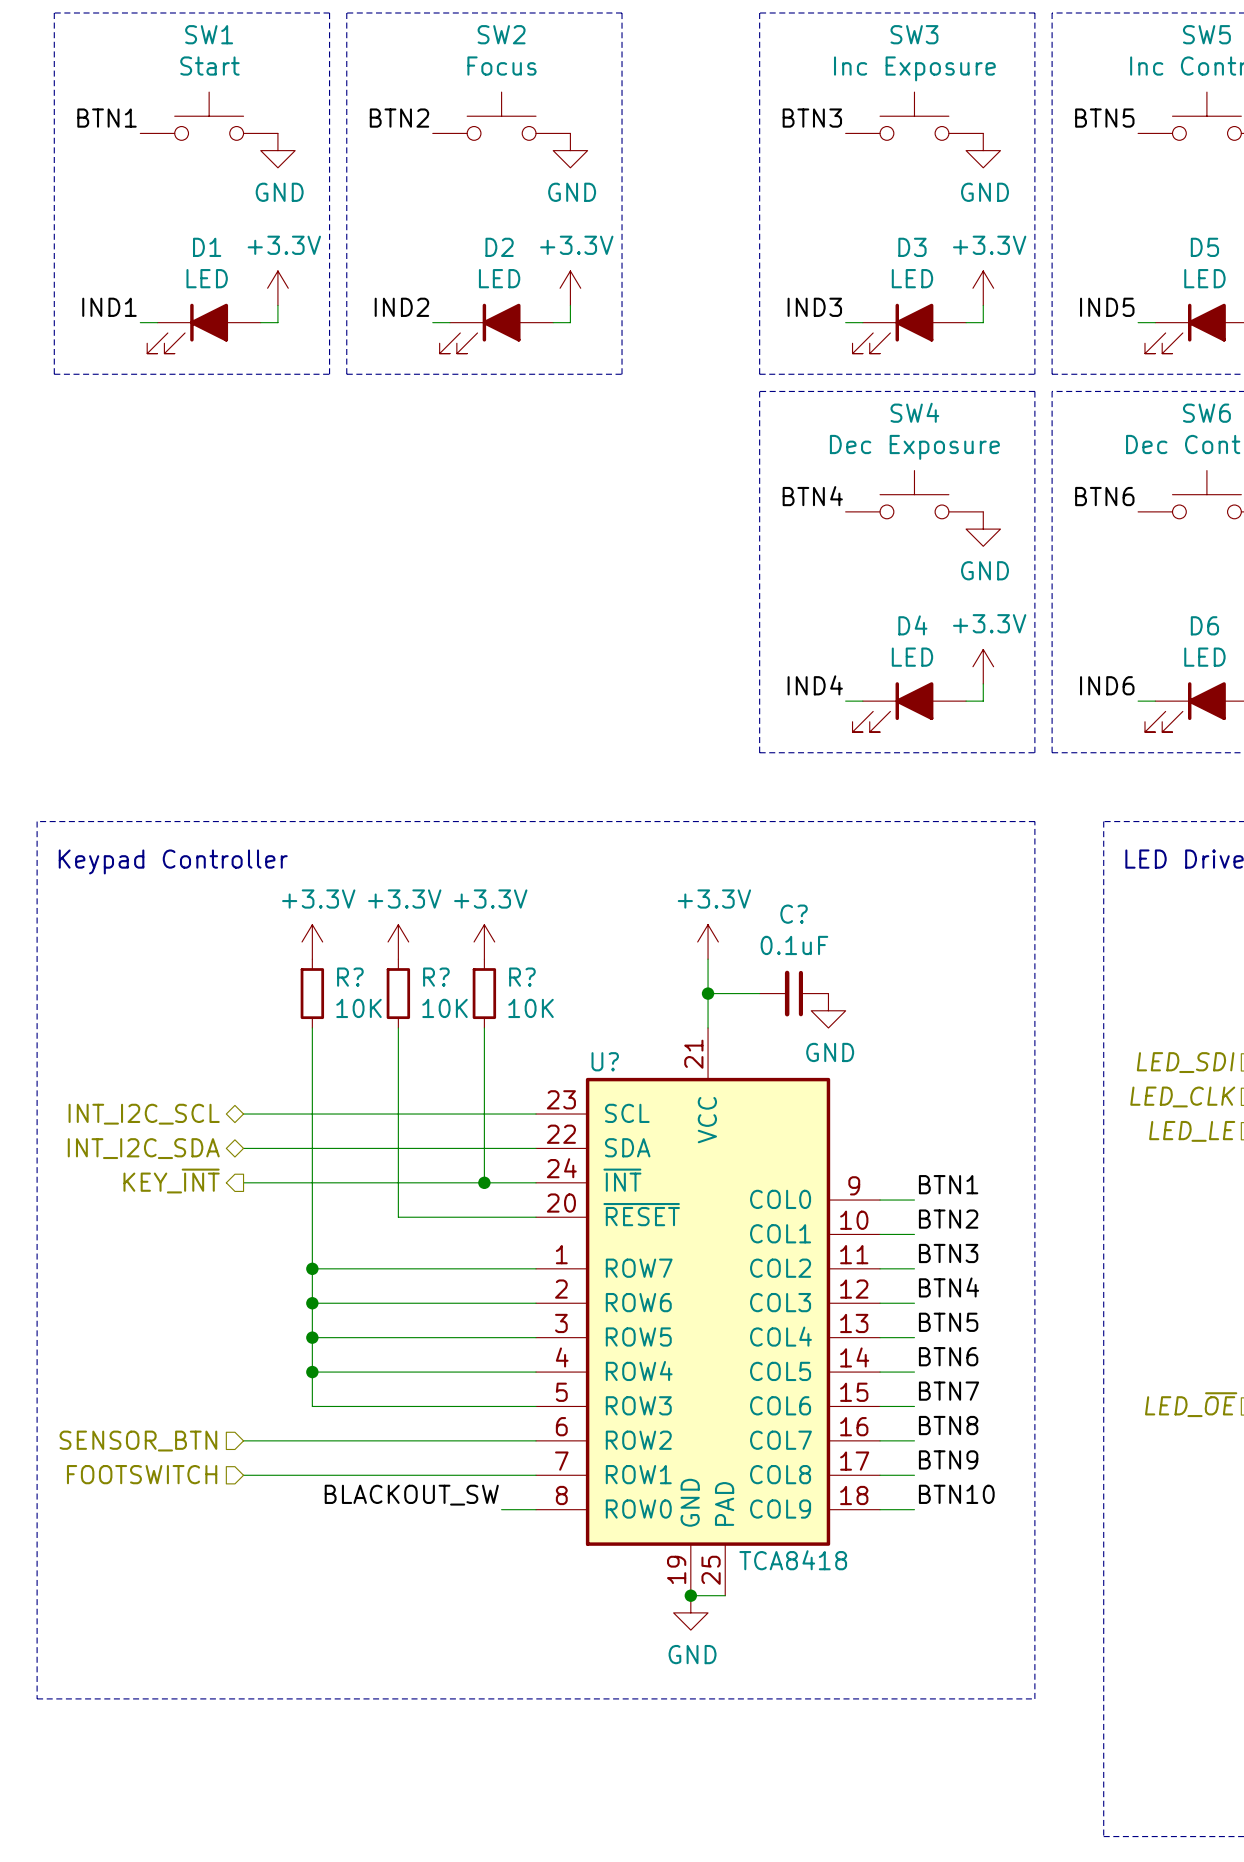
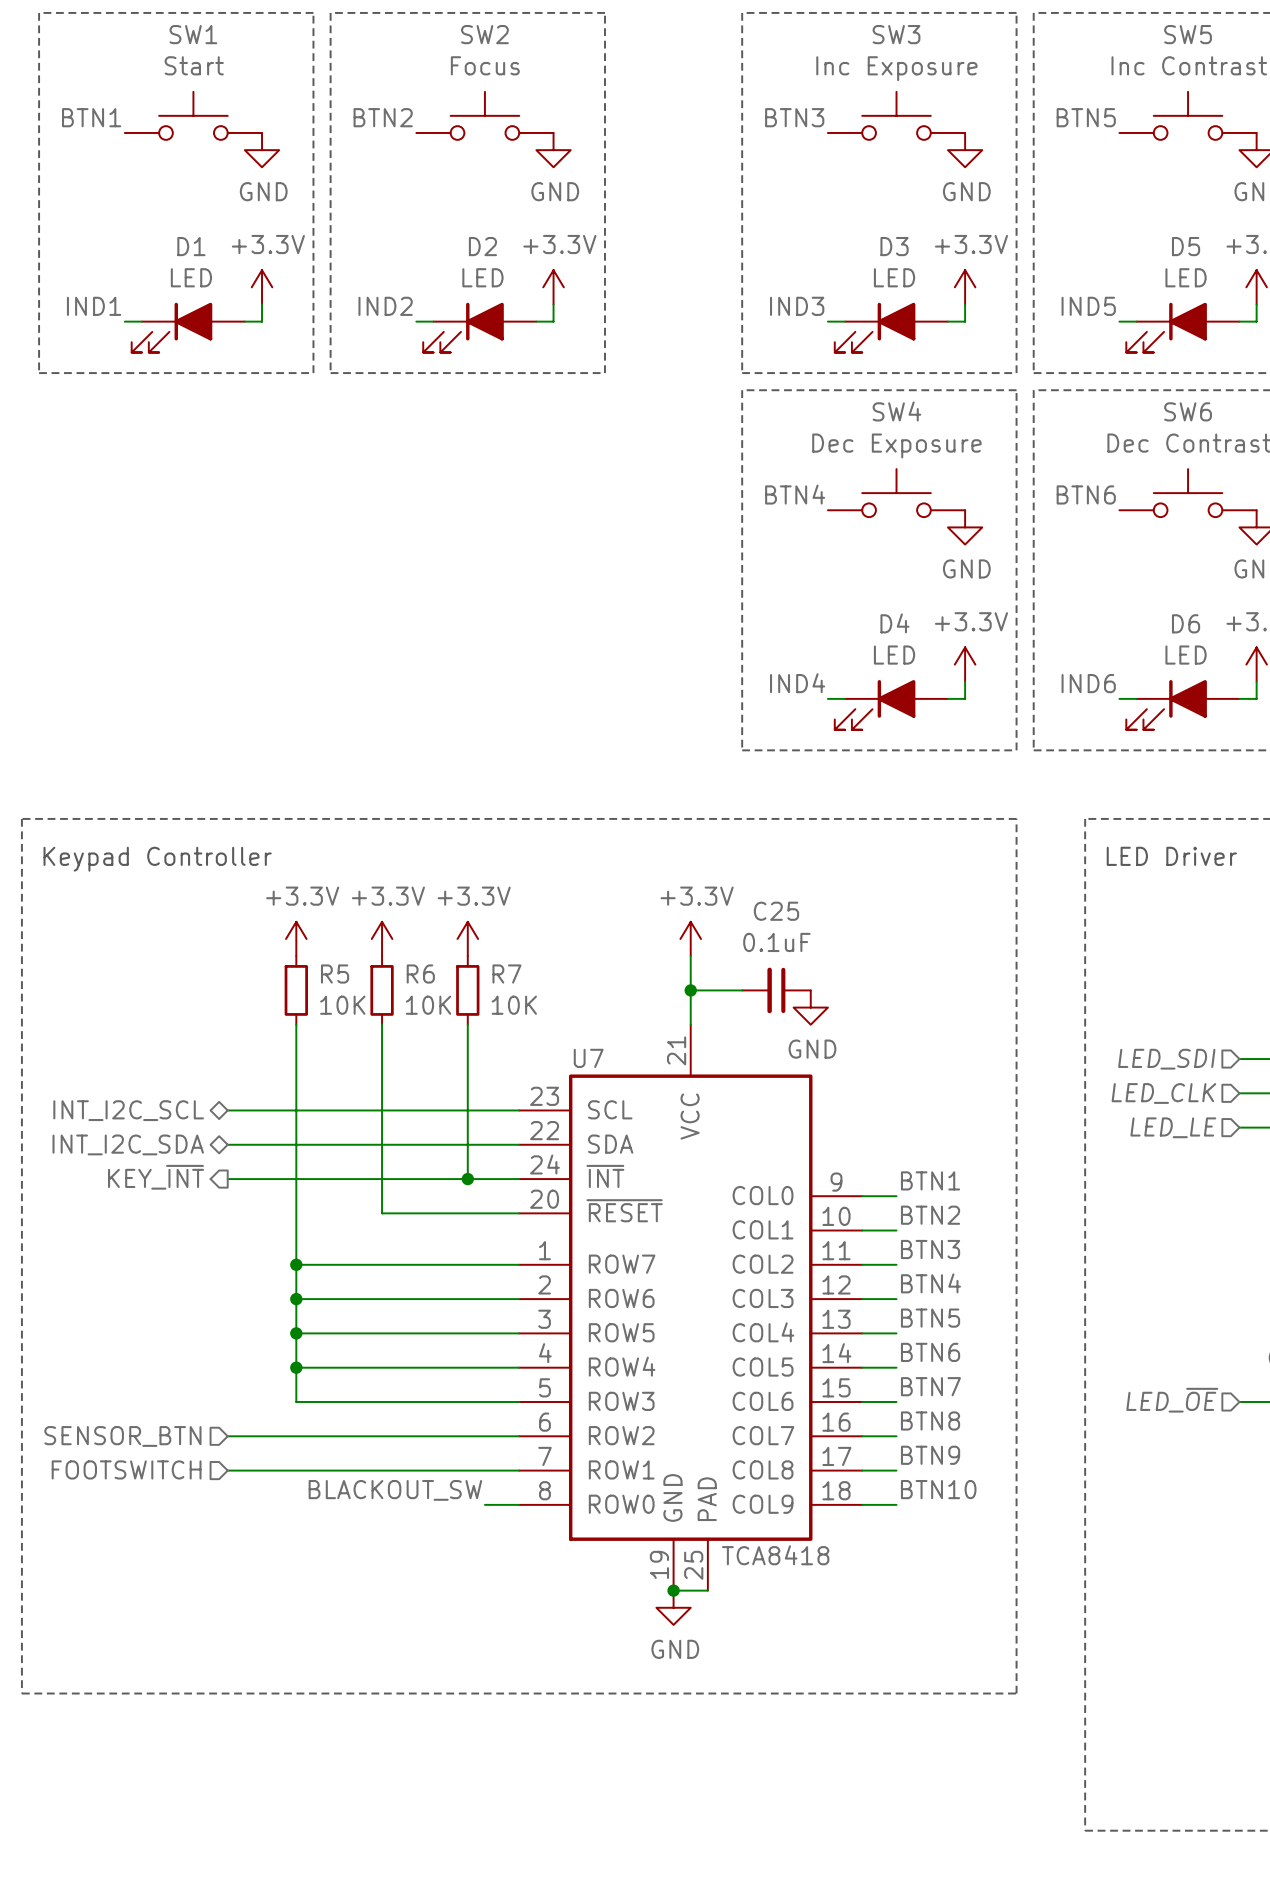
C? name: C? (794, 914) -> C25 (776, 911)
R? name: R? (350, 977) -> R5 (335, 974)
R? name: R? (436, 977) -> R6 (420, 974)
R? name: R? (522, 977) -> R7 (506, 974)
U? name: U? (605, 1061) -> U7 (588, 1058)

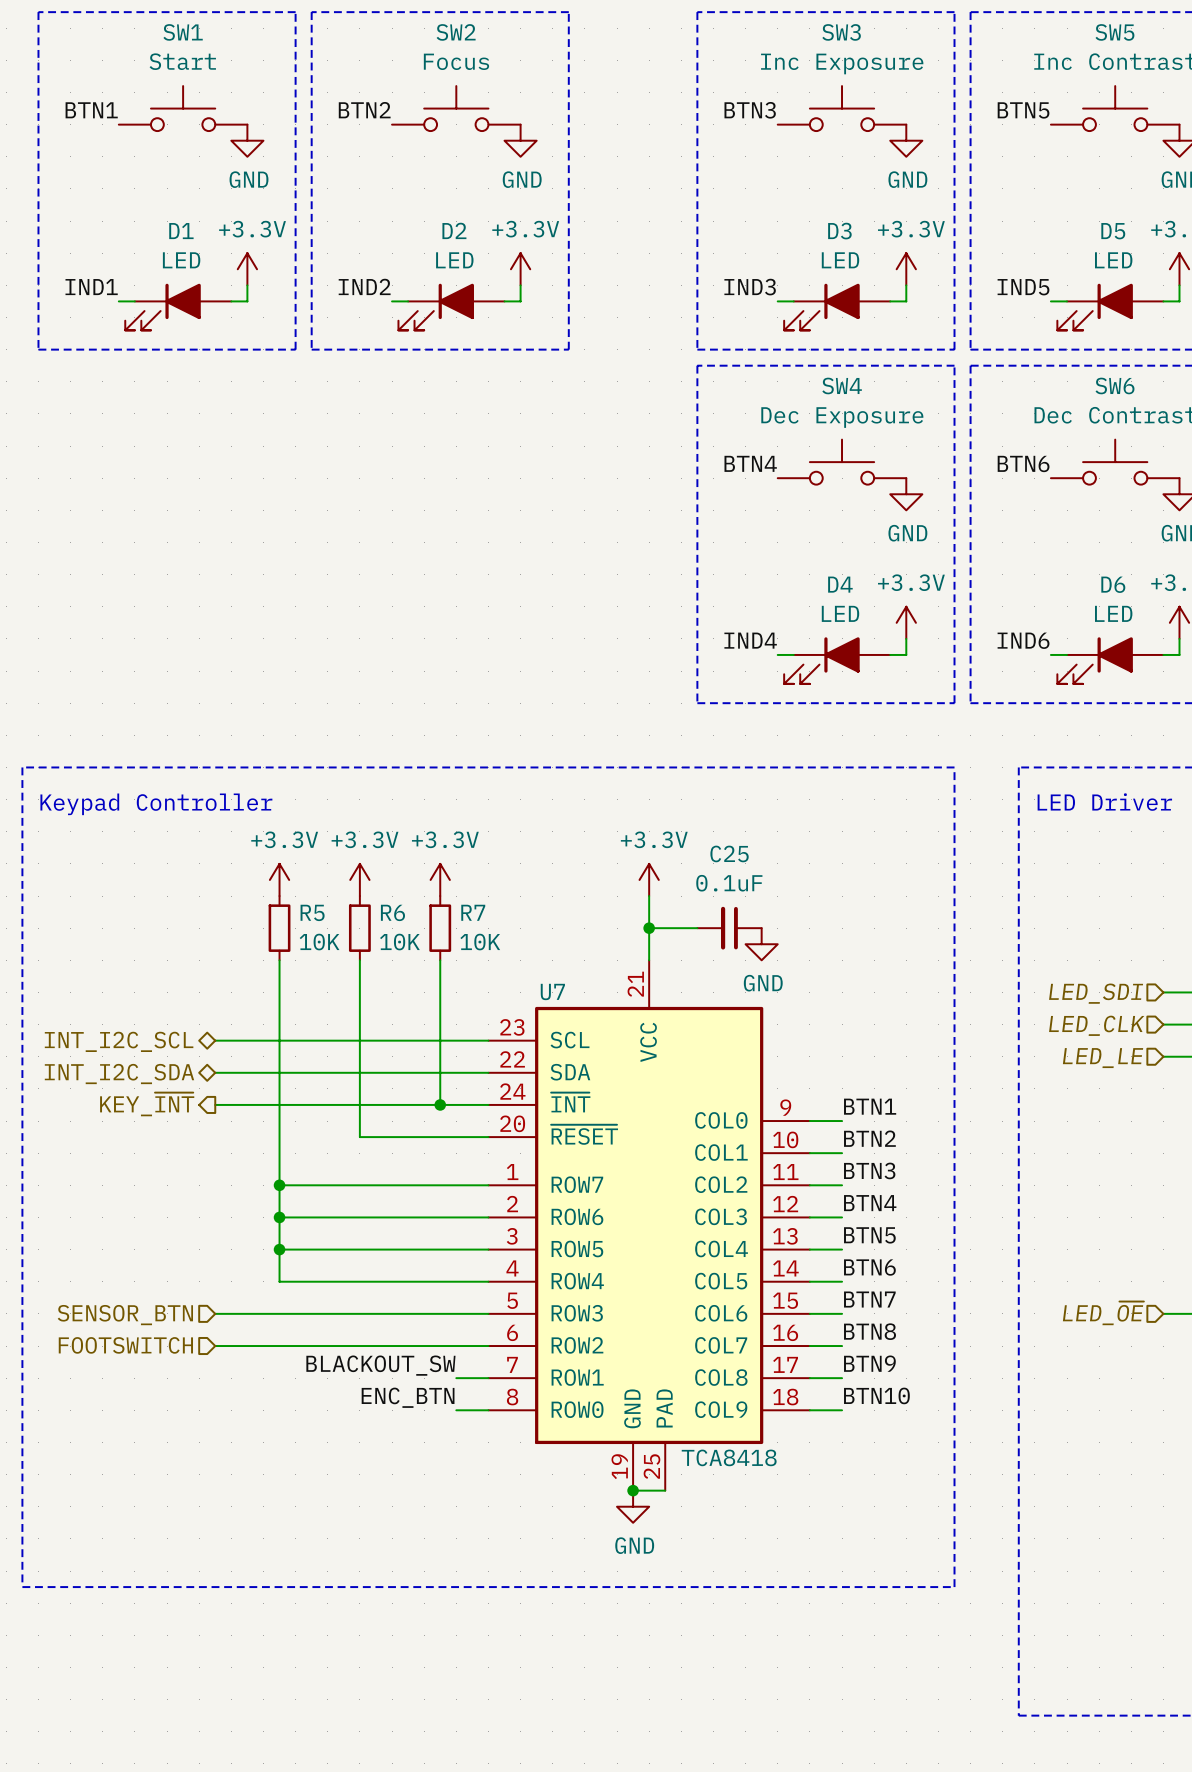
wire: (296, 1367) (296, 1401) -> (215, 1313) (279, 1313)
junction: (296, 1367) -> none
hierarchical label: none -> SENSOR_BTN (125, 1315)
hierarchical label: SENSOR_BTN (122, 1436) -> FOOTSWITCH (125, 1345)
label: none -> BLACKOUT_SW (380, 1365)
hierarchical label: FOOTSWITCH (126, 1469) -> none
wire: (227, 1470) (484, 1470) -> none
label: BLACKOUT_SW (395, 1490) -> ENC_BTN (408, 1397)

